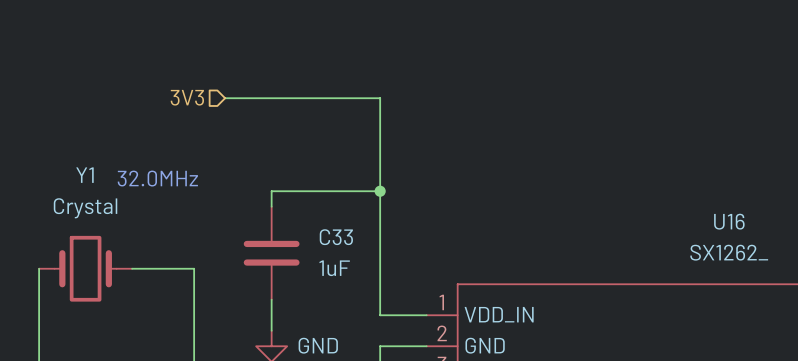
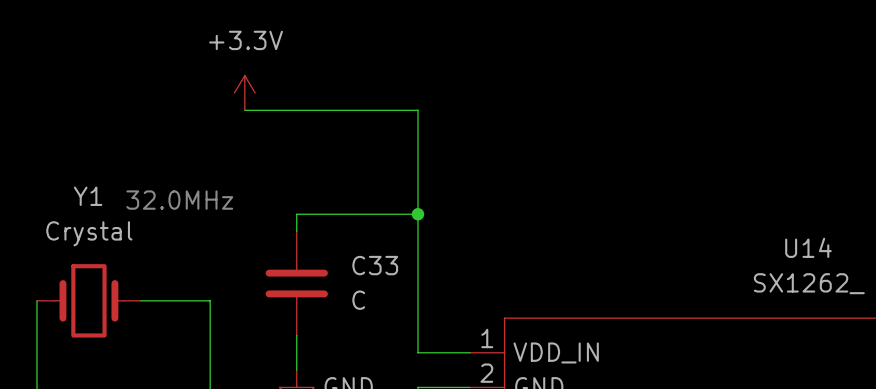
power symbol: none -> +3.3V (244, 93)
hierarchical label: 3V3 (187, 97) -> none
U16 name: U16 (729, 221) -> U14 (808, 247)
C33 value: 1uF (334, 268) -> C (358, 300)

